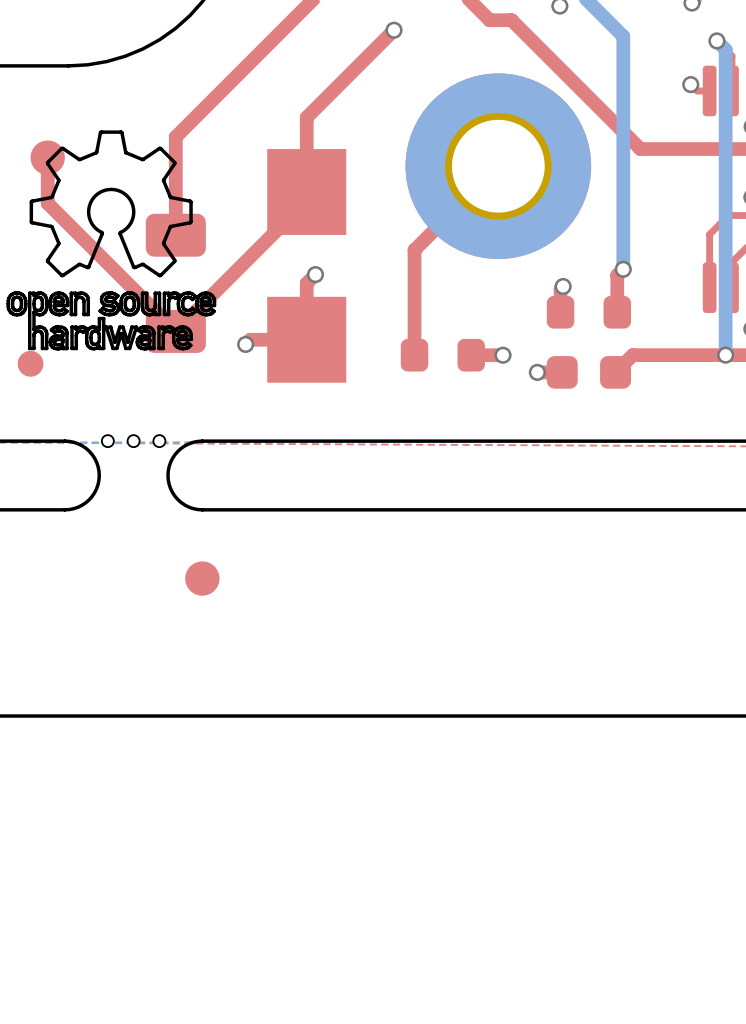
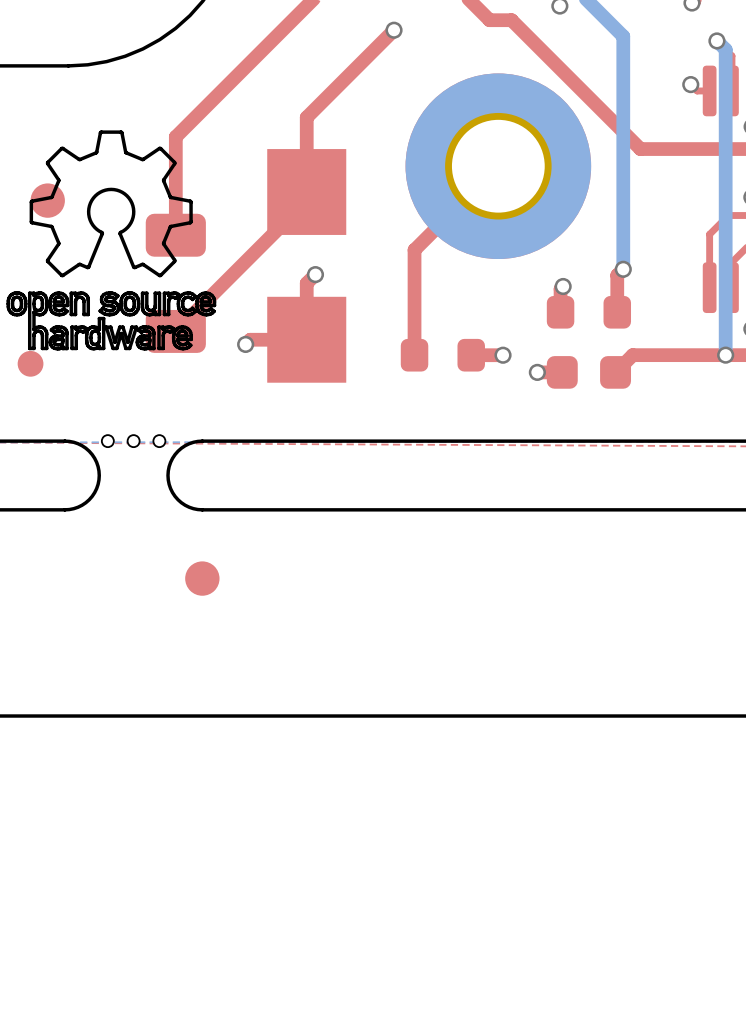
top track: (47, 157) (47, 203) (175, 331) -> none
part position: (47, 157) -> (47, 200)

